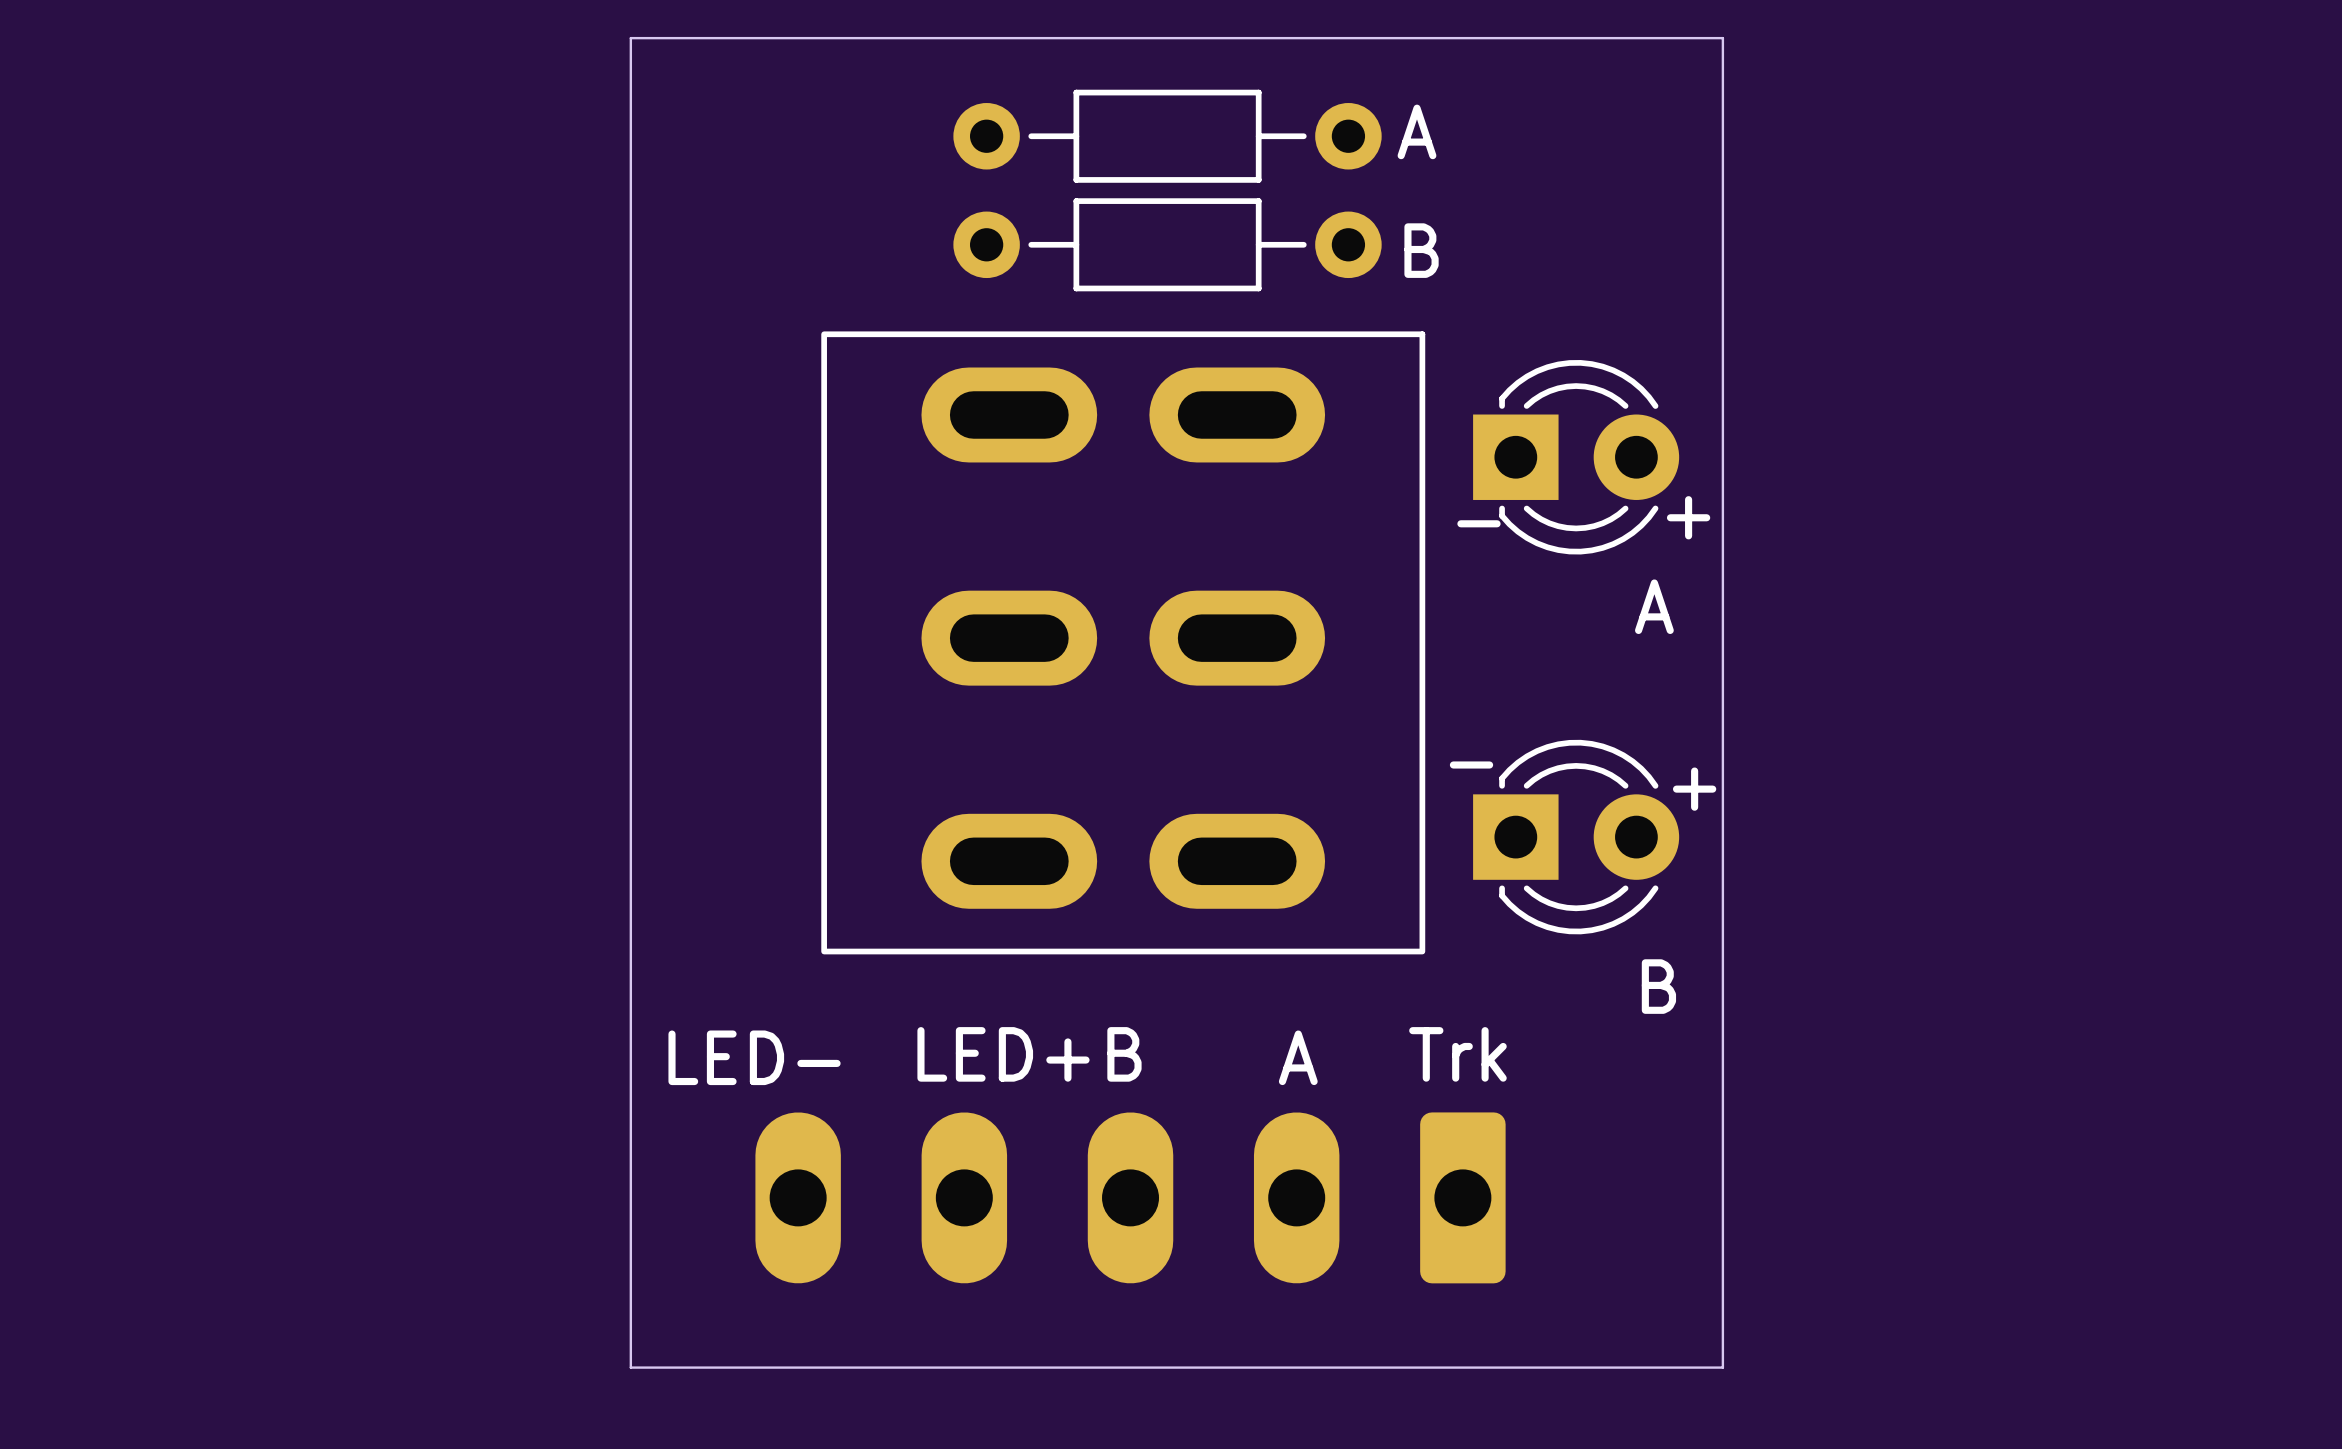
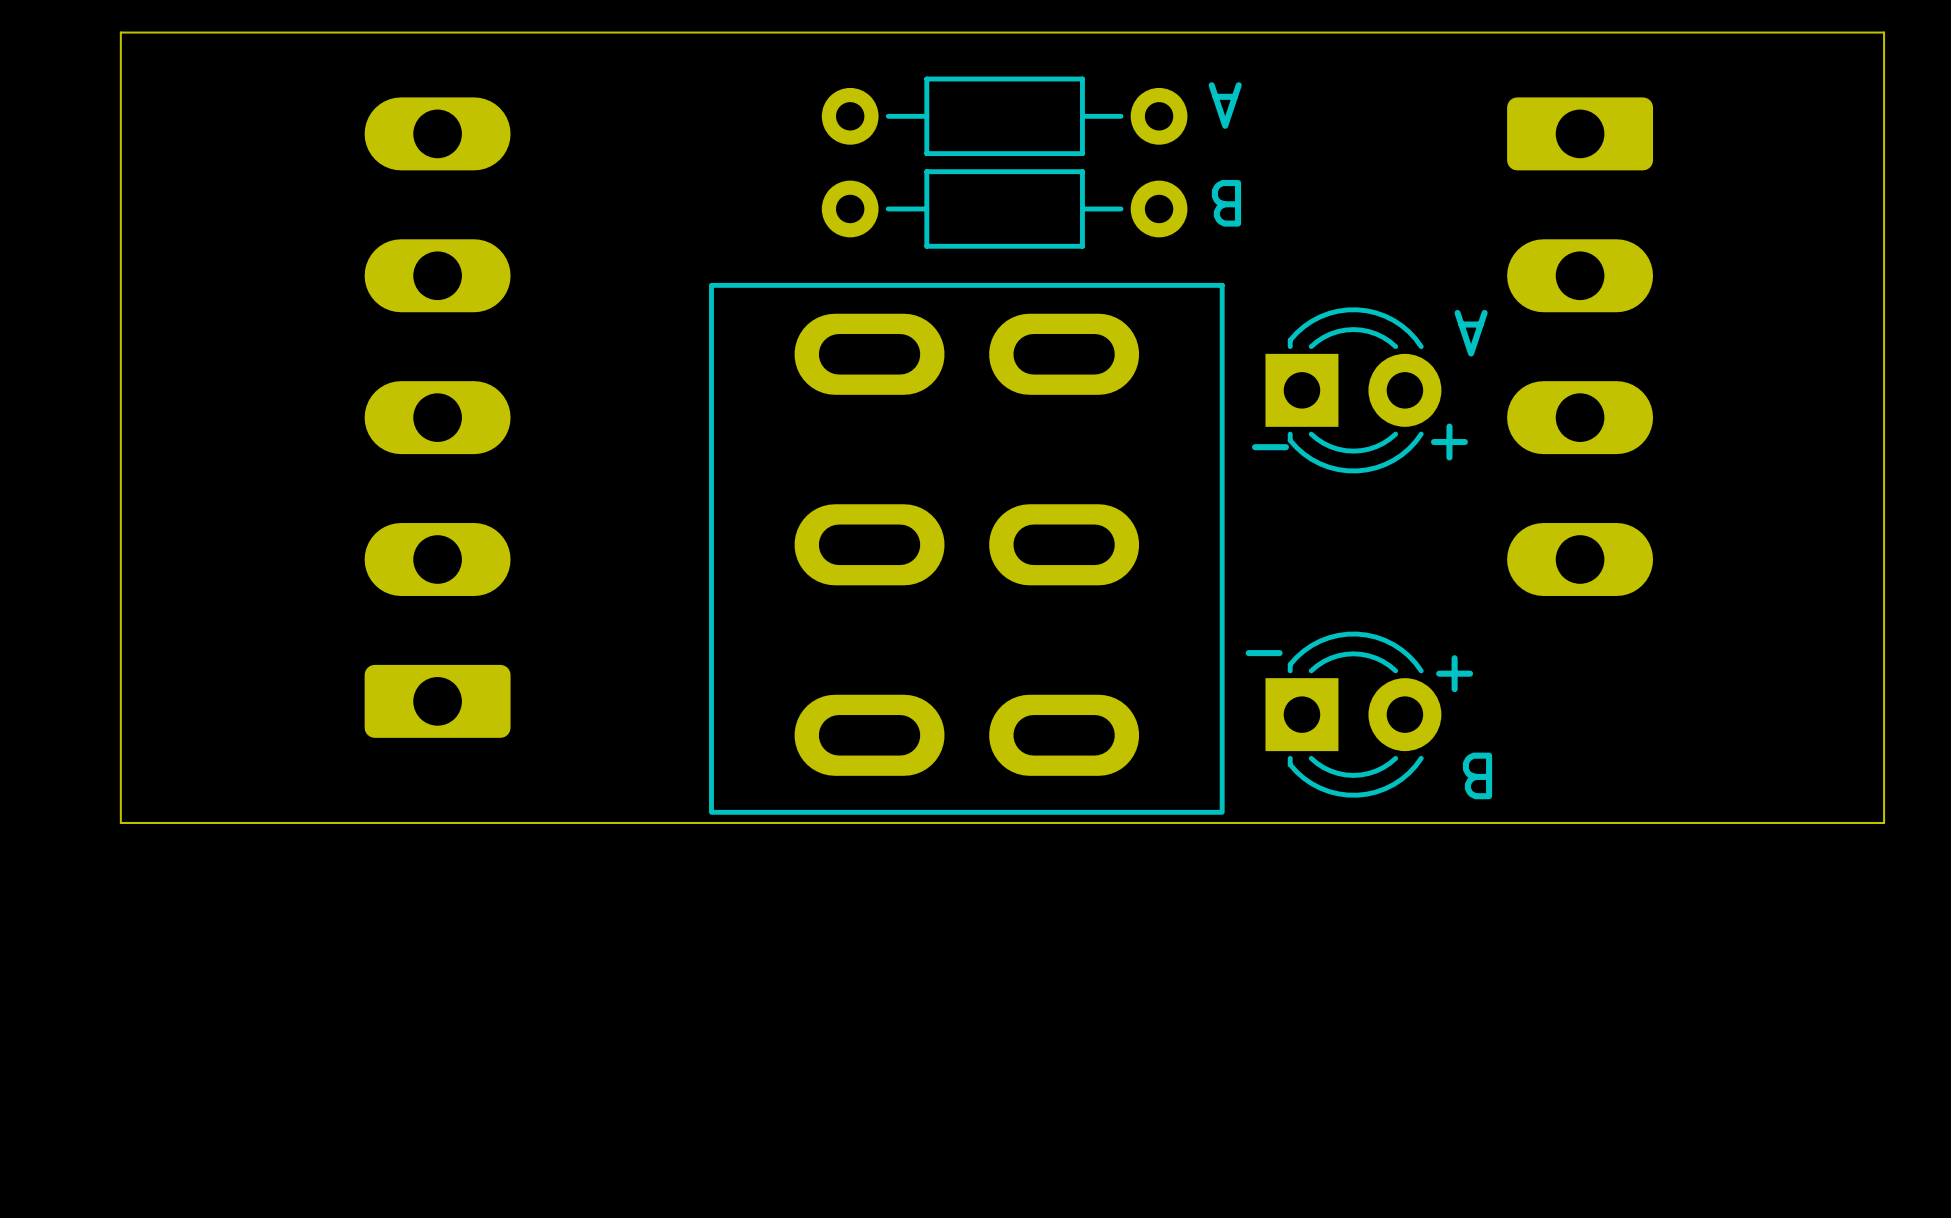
board edge: (630, 38) (630, 1367) (1722, 1367) (1722, 38) -> (546, 32) (120, 32) (120, 822) (1884, 822) (1884, 32) (1478, 32)
text rotation: 0° (1417, 131) -> 180° (1225, 105)
text rotation: 0° (1421, 250) -> 180° (1226, 203)
text: none -> A (1471, 333)
part: none -> (1580, 346)
text: A (1654, 606) -> none
text rotation: 0° (1658, 986) -> 180° (1477, 775)
text: LED+ (1003, 1054) -> none
text: B (1124, 1054) -> none
text: Trk (1457, 1054) -> none
text: LED- (754, 1057) -> none
text: A (1298, 1057) -> none
part rotation: 0° (1130, 1197) -> 90° clockwise (437, 417)
part position: (1130, 1197) -> (437, 417)

